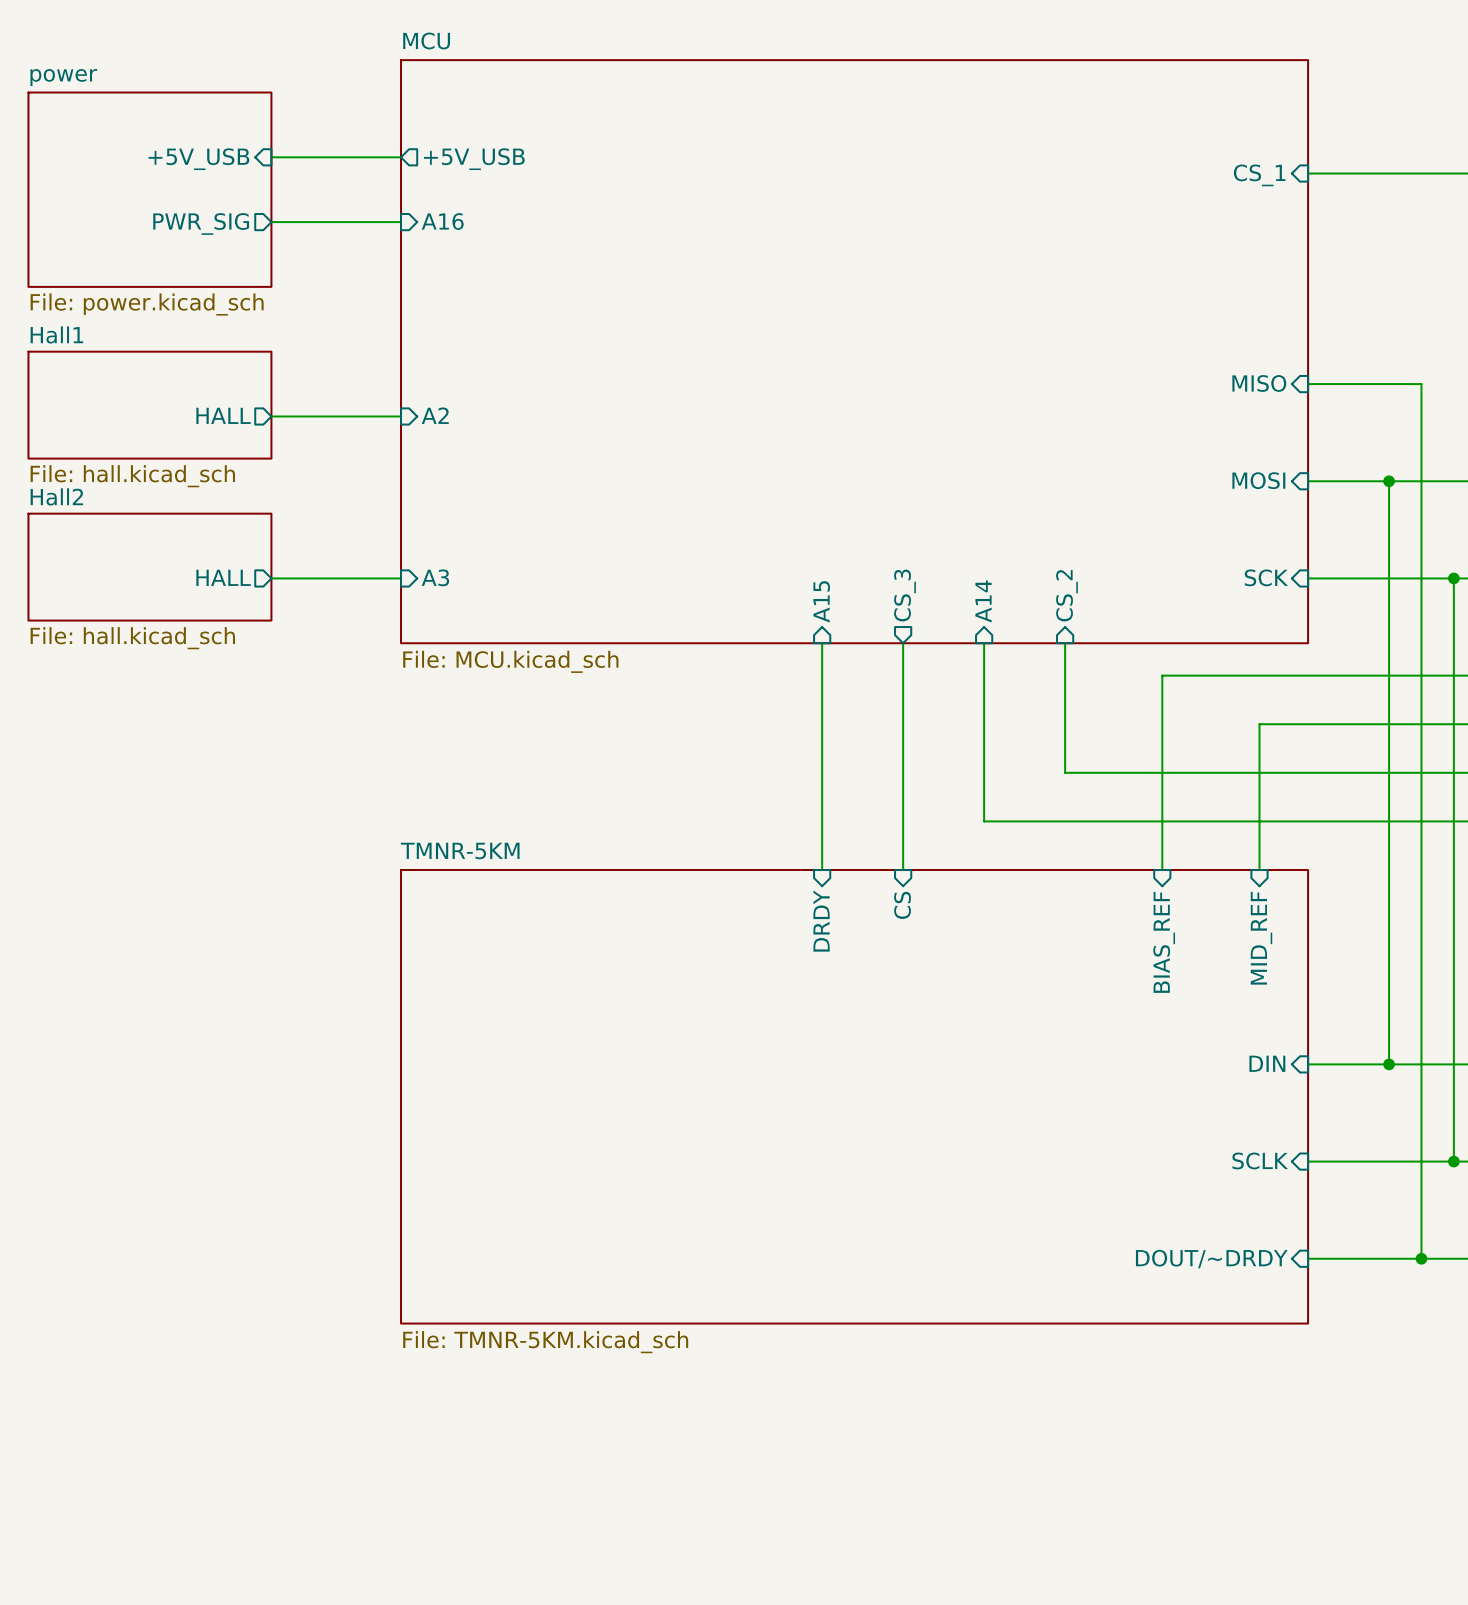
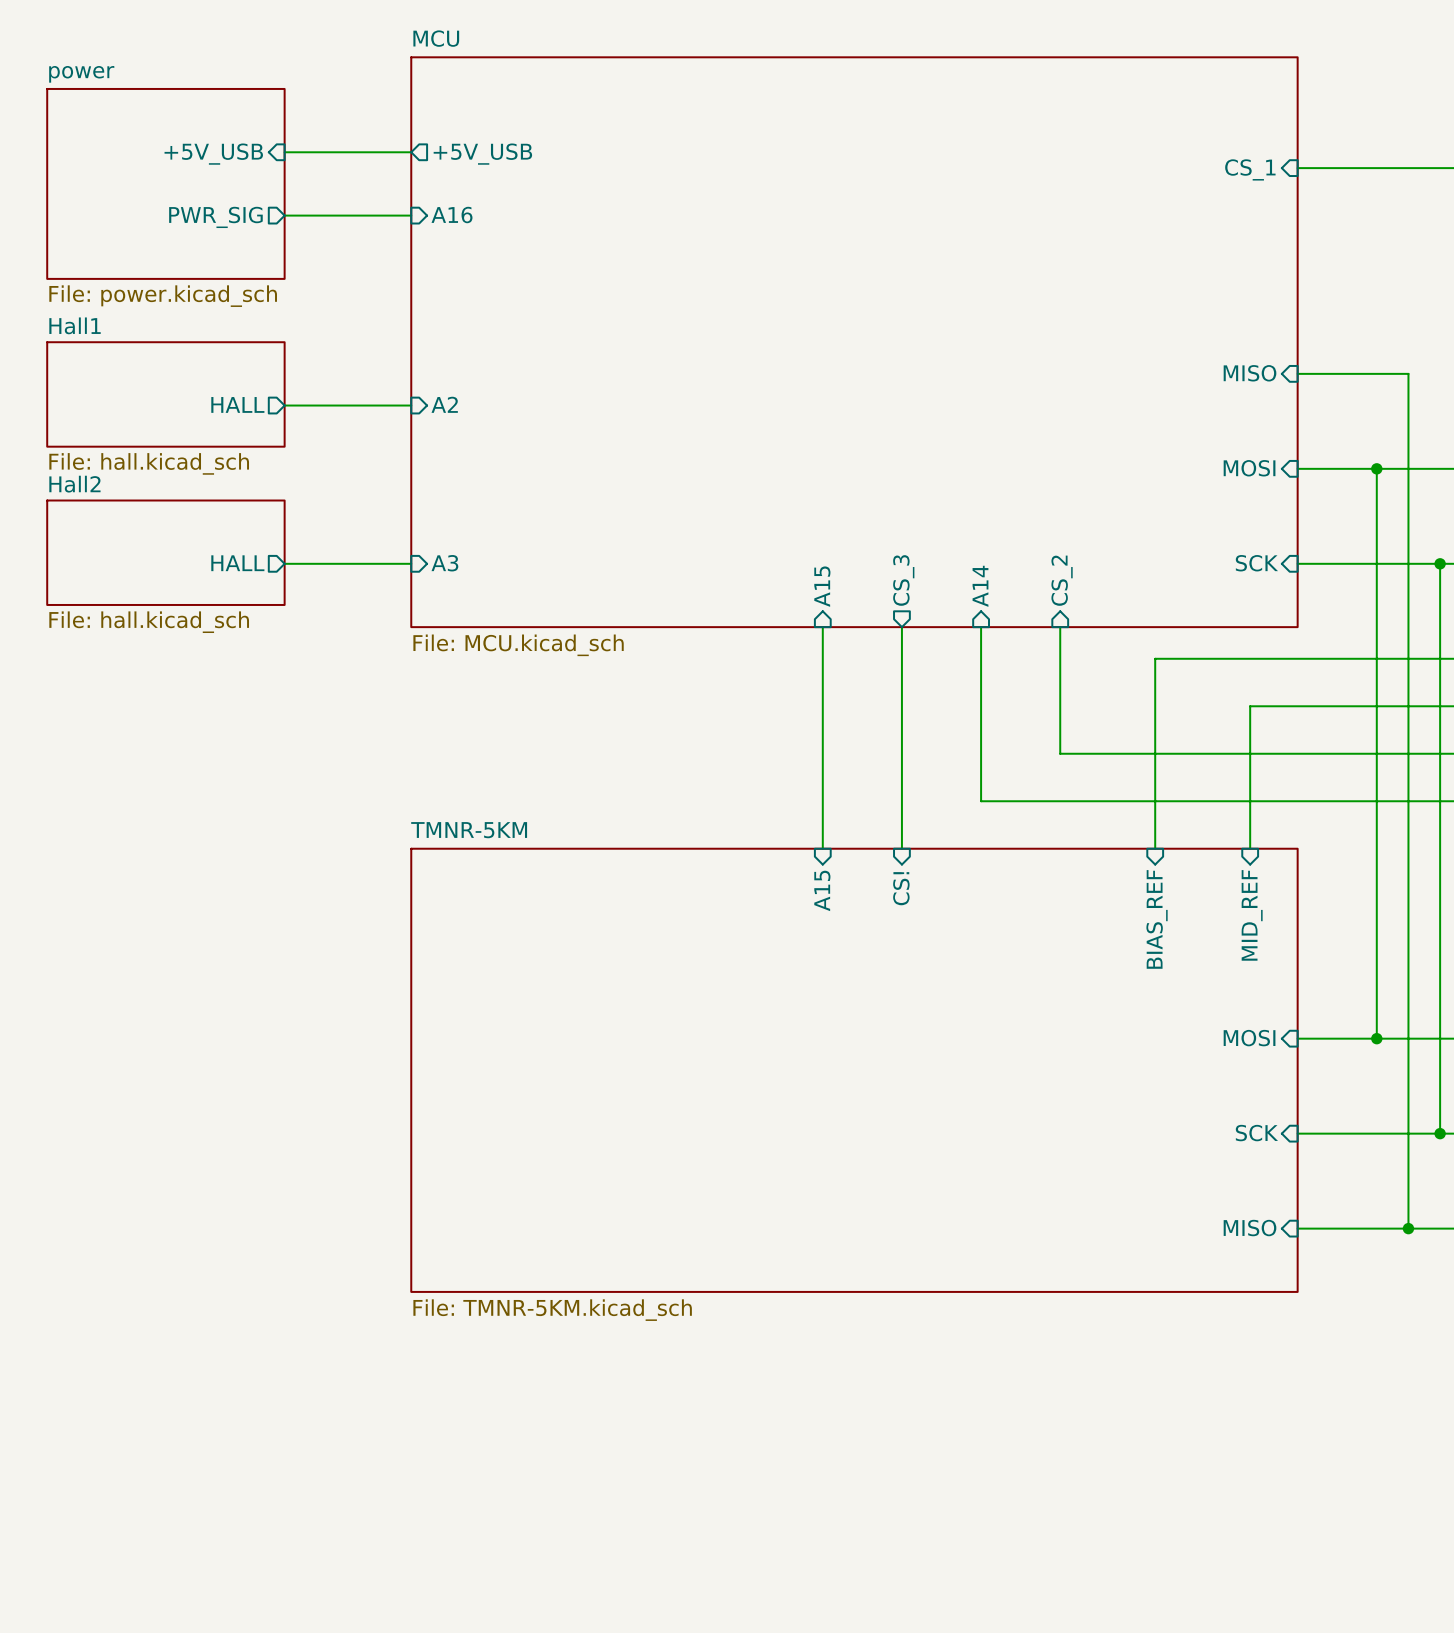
sheet pin: CS (902, 905) -> CS! (901, 888)
sheet pin: DRDY (821, 921) -> A15 (822, 890)
sheet pin: DIN (1267, 1063) -> MOSI (1249, 1038)
sheet pin: SCLK (1260, 1160) -> SCK (1256, 1133)
sheet pin: DOUT/~DRDY (1211, 1259) -> MISO (1250, 1228)

